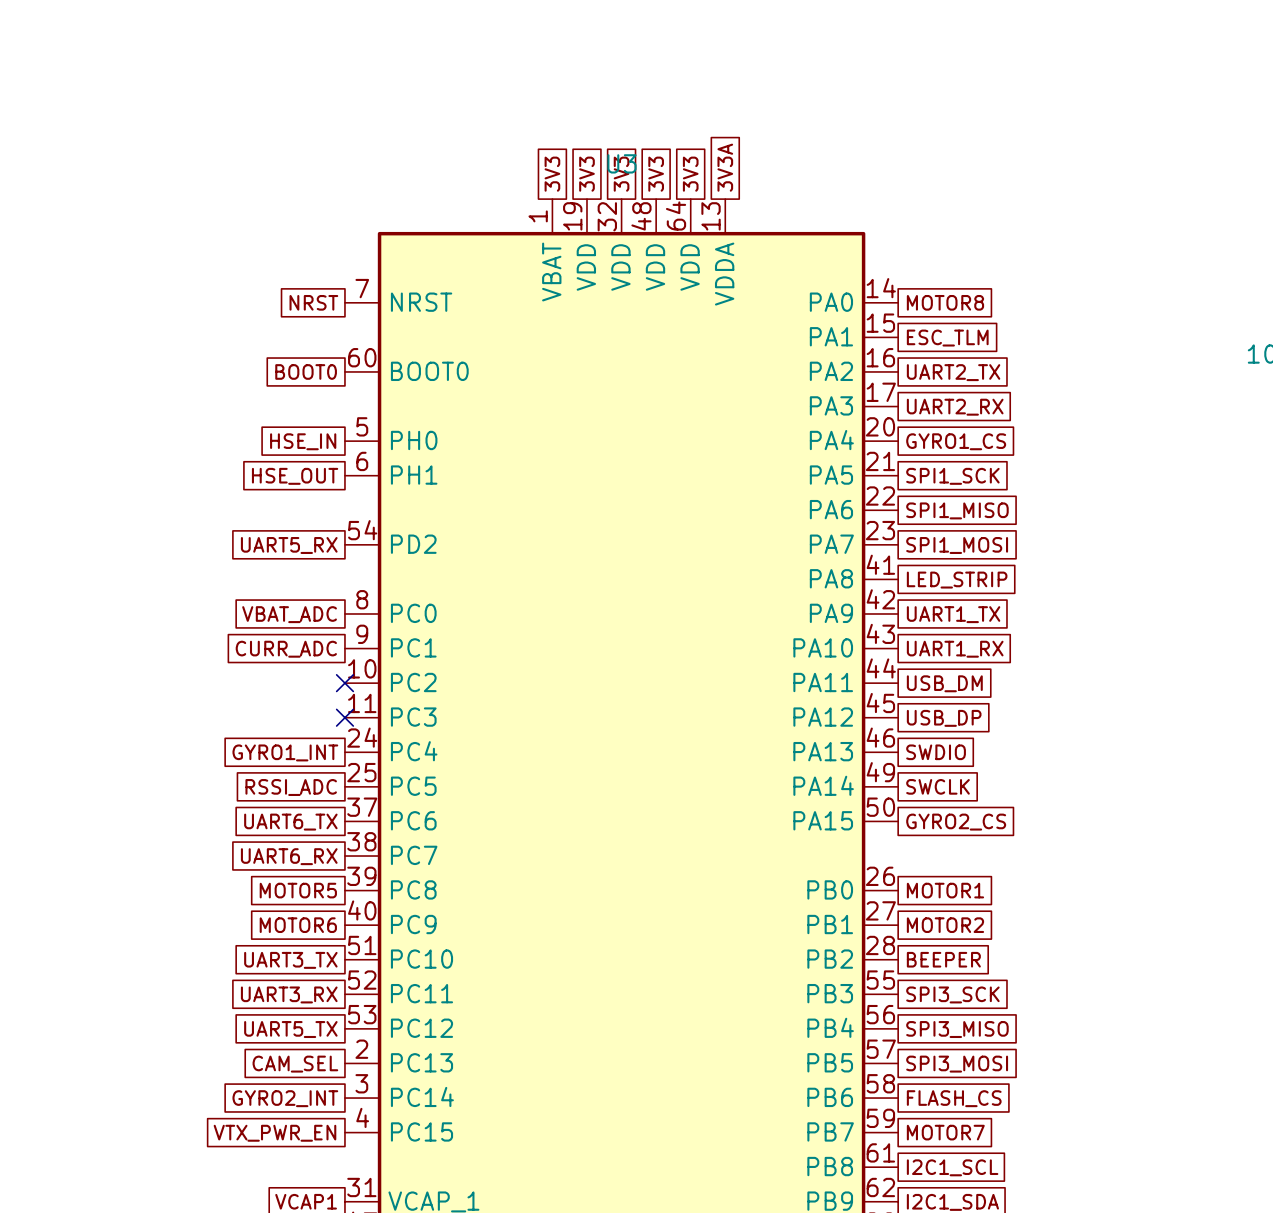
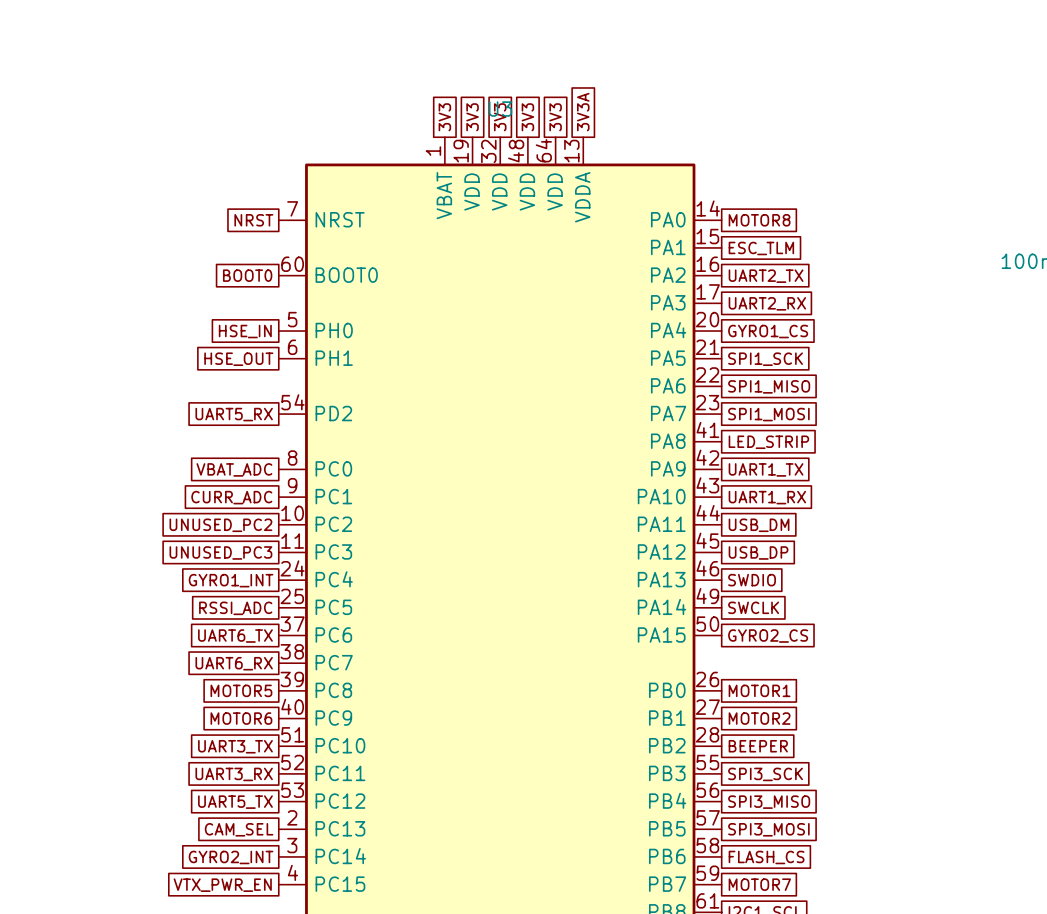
global label: none -> UNUSED_PC2 (220, 525)
no-connect mark: (344, 683) -> none
no-connect mark: (344, 717) -> none
global label: none -> UNUSED_PC3 (220, 552)

